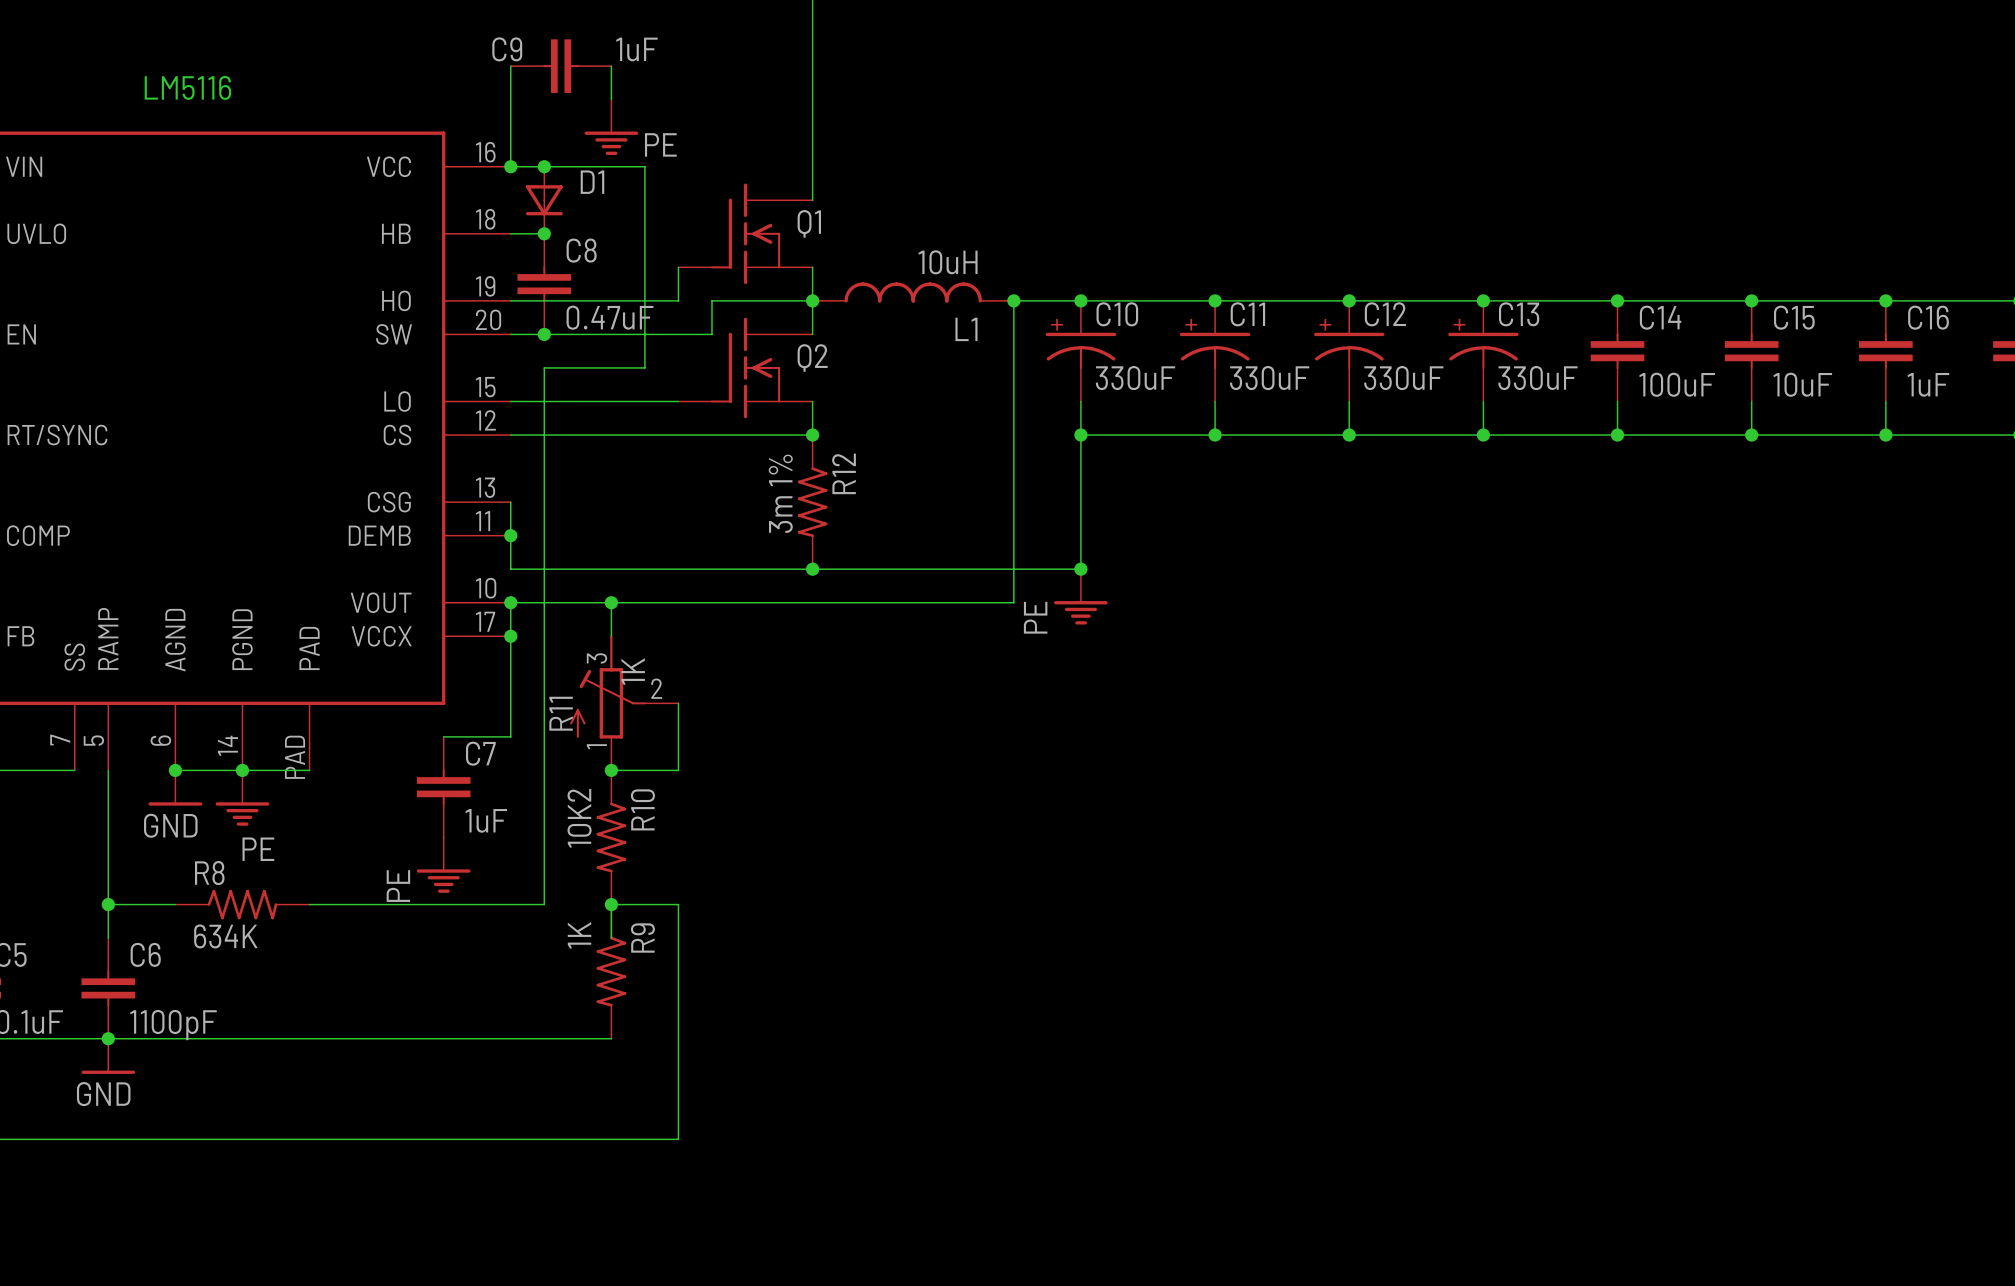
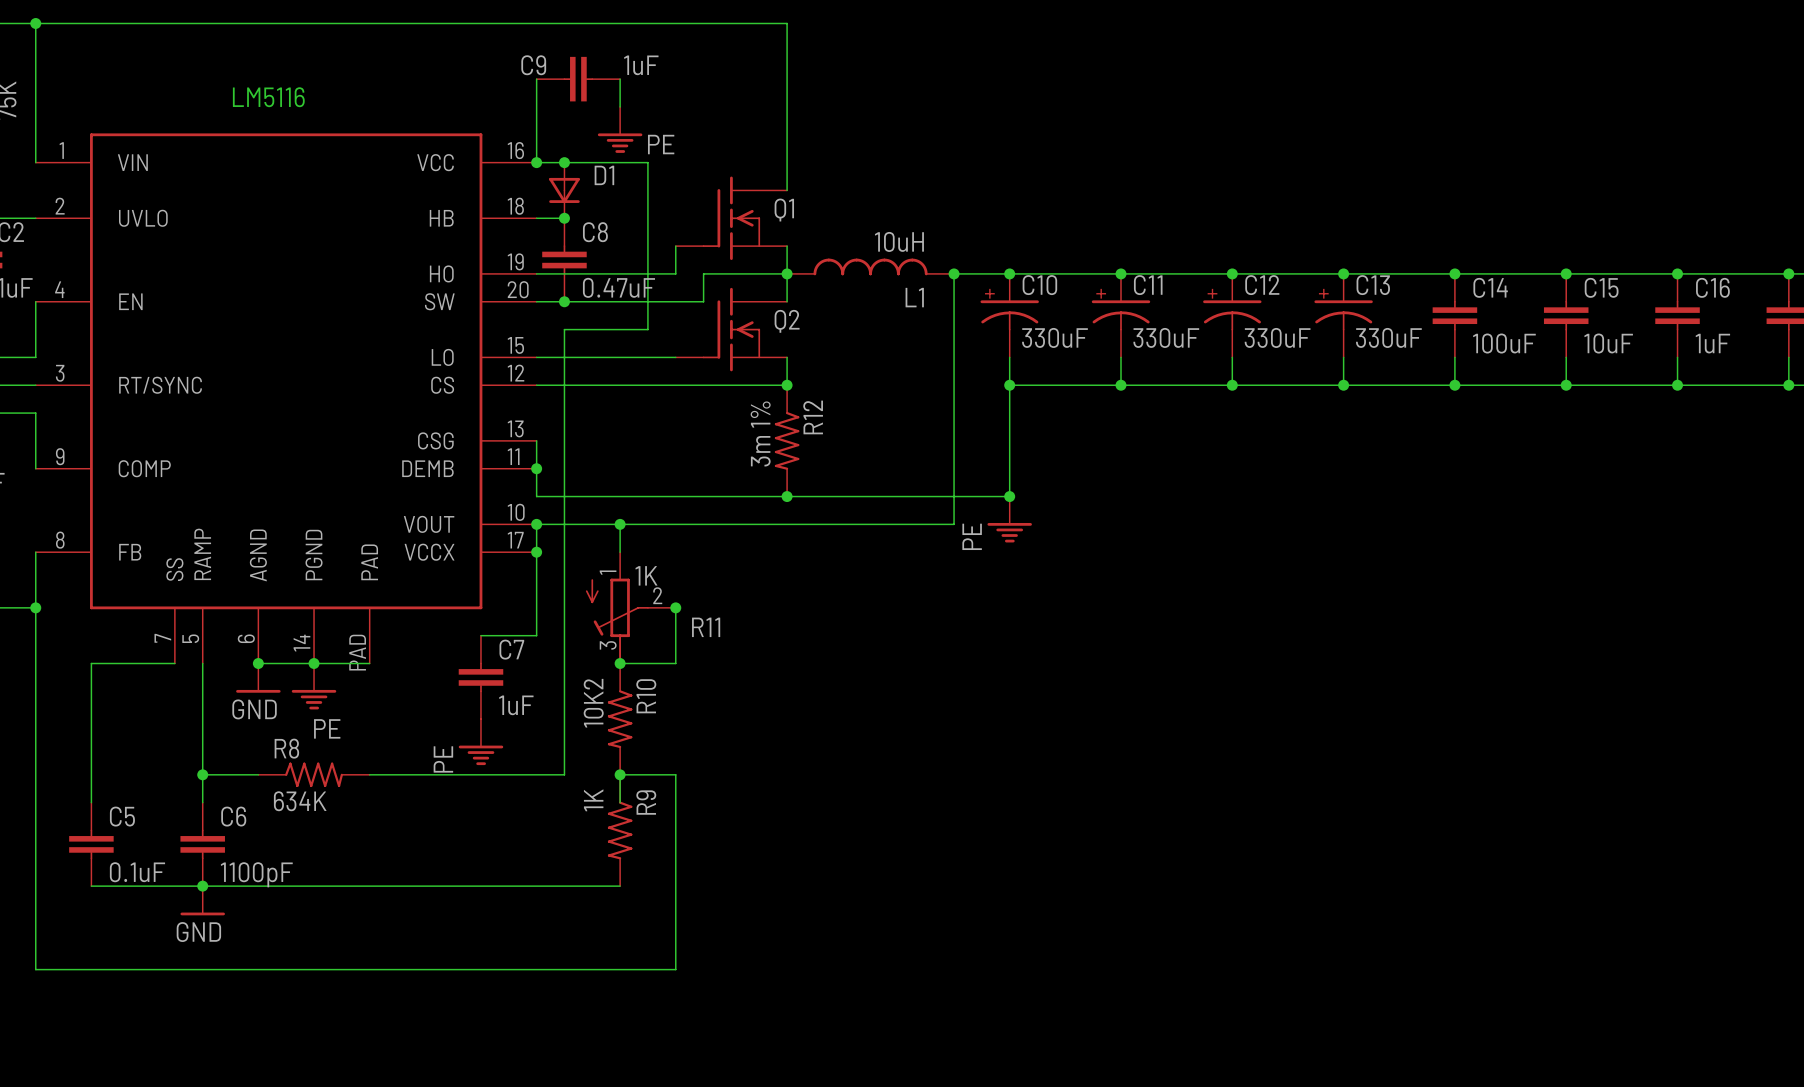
R11 flip: as is (608, 686) -> up-down (617, 621)
junction: none -> (675, 607)
R11 name position: R11 (561, 713) -> R11 (706, 627)

